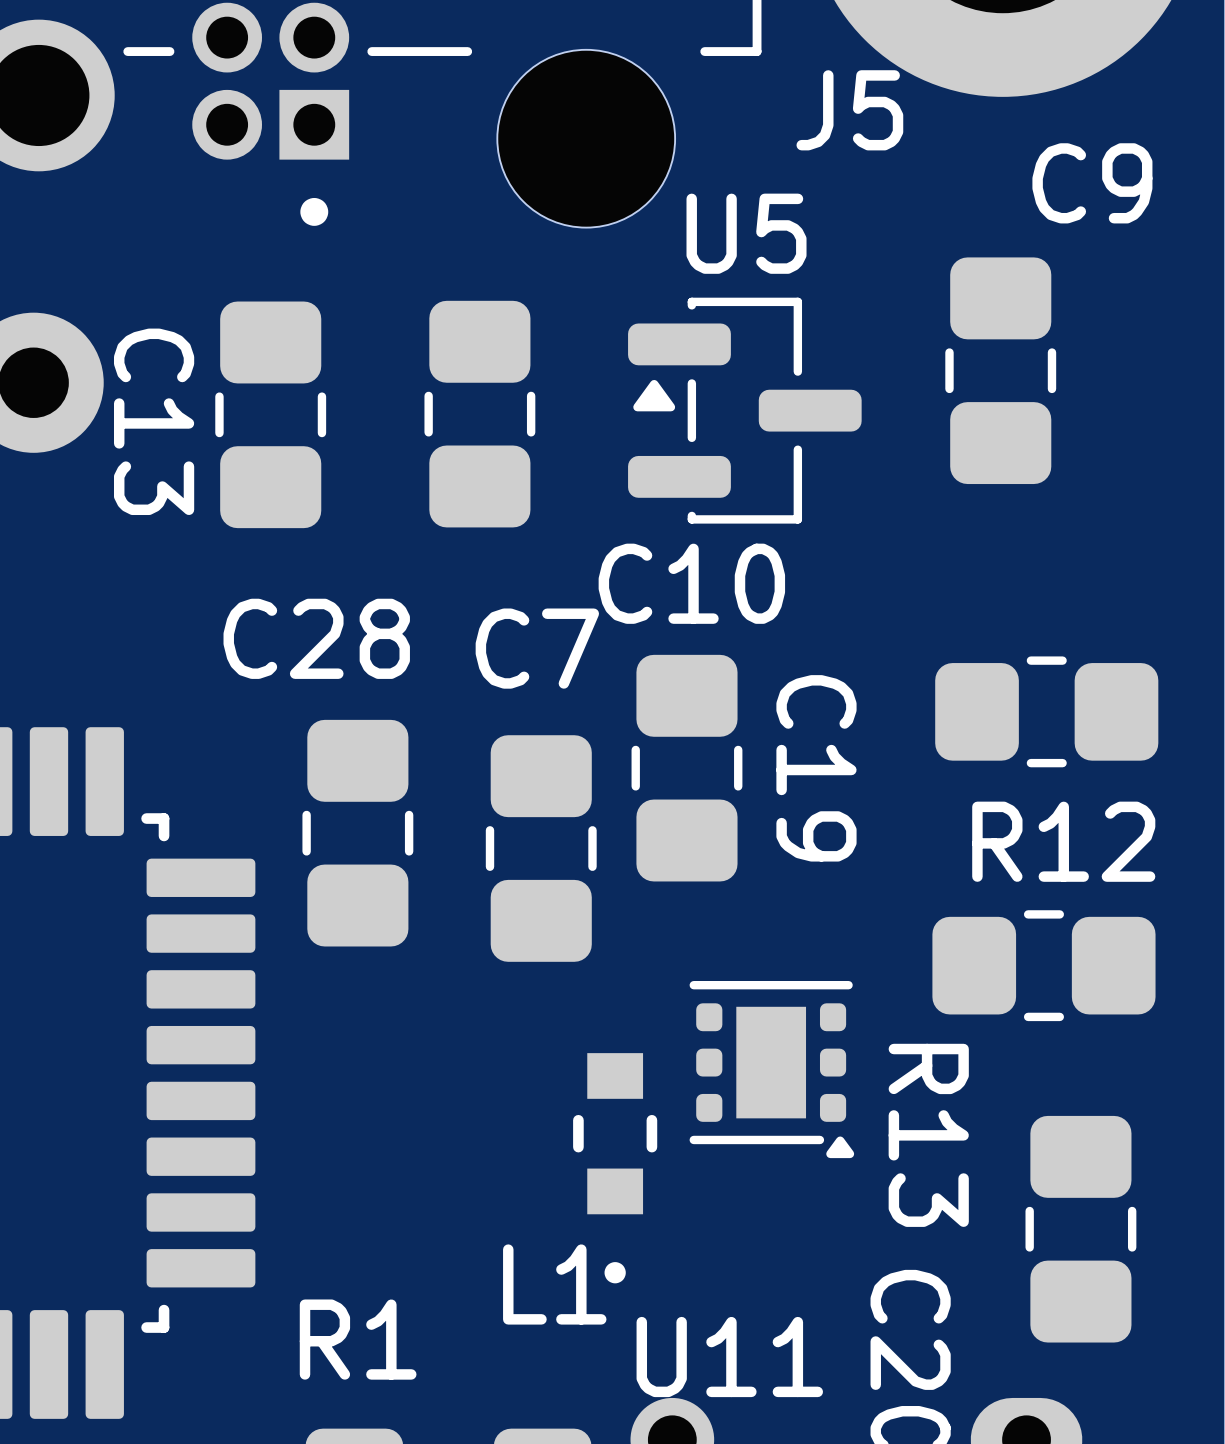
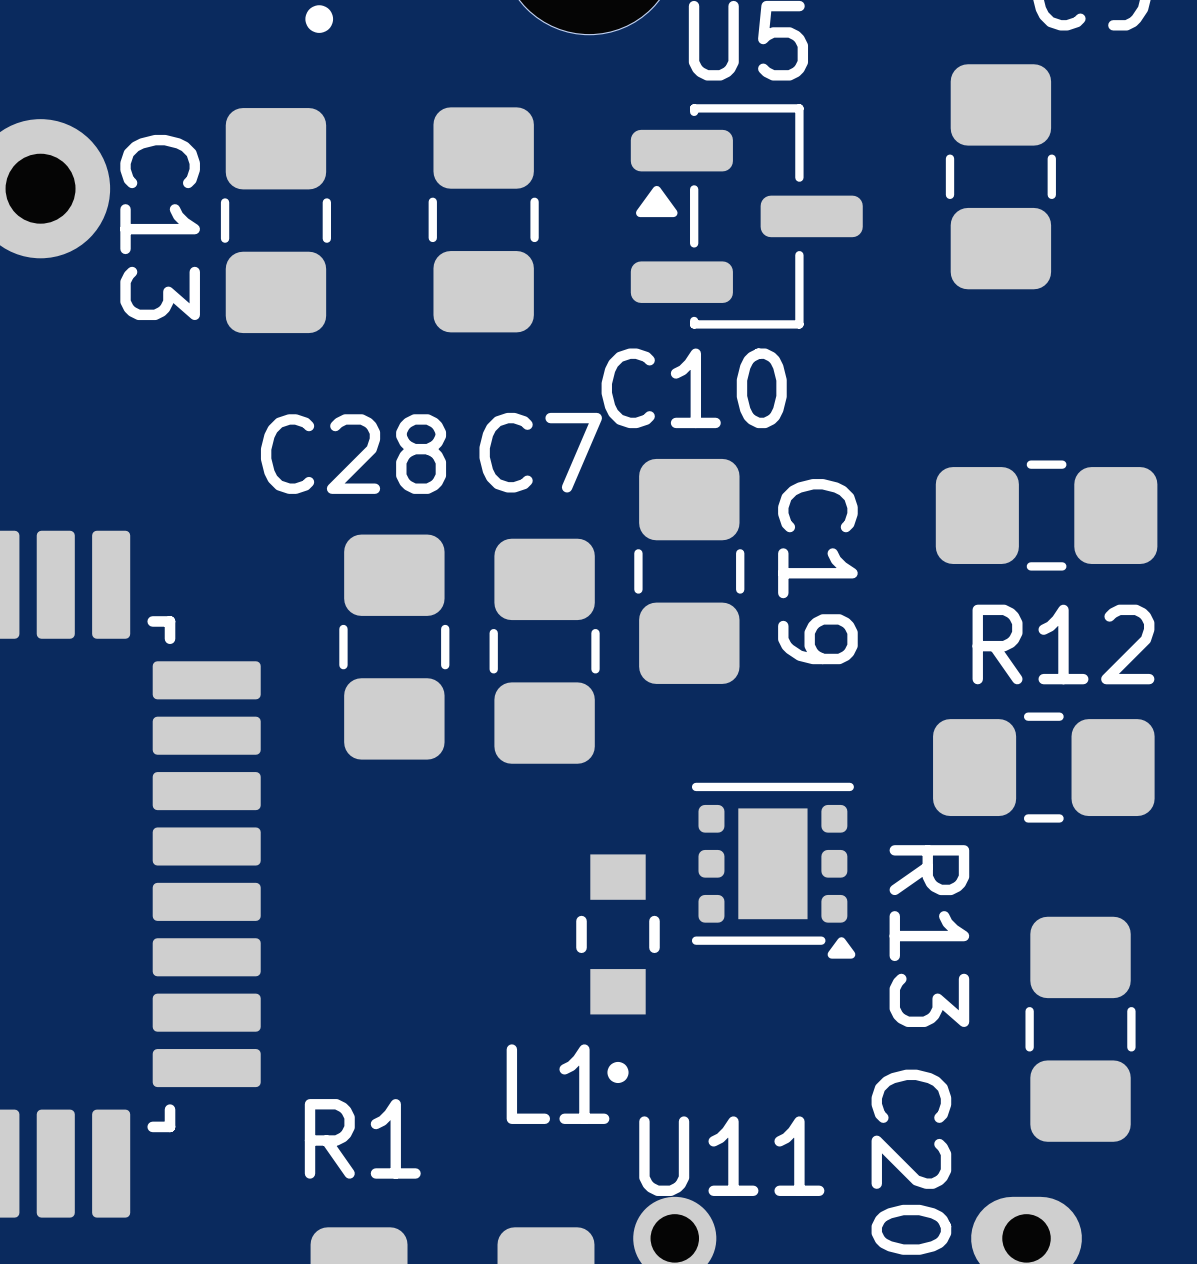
C28 position: (357, 833) -> (394, 647)

